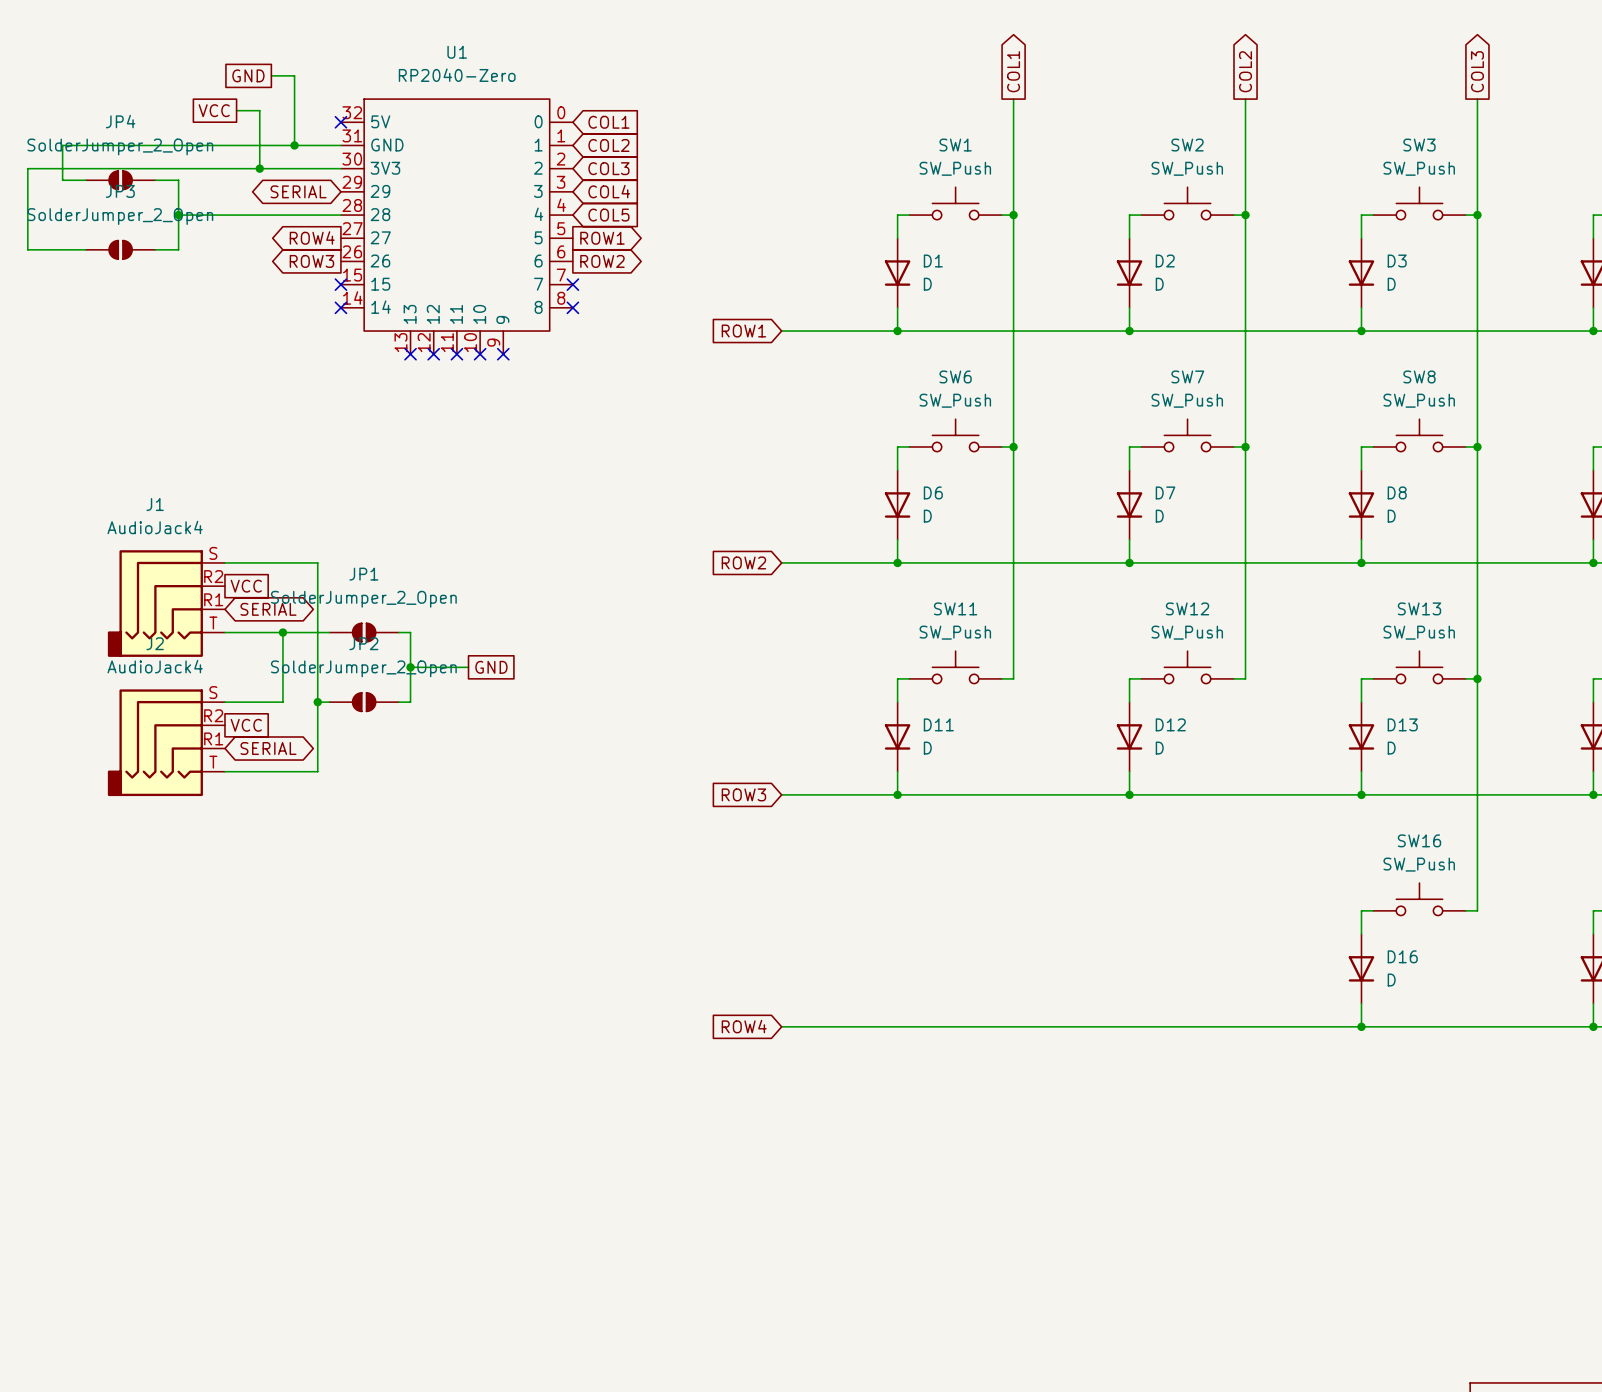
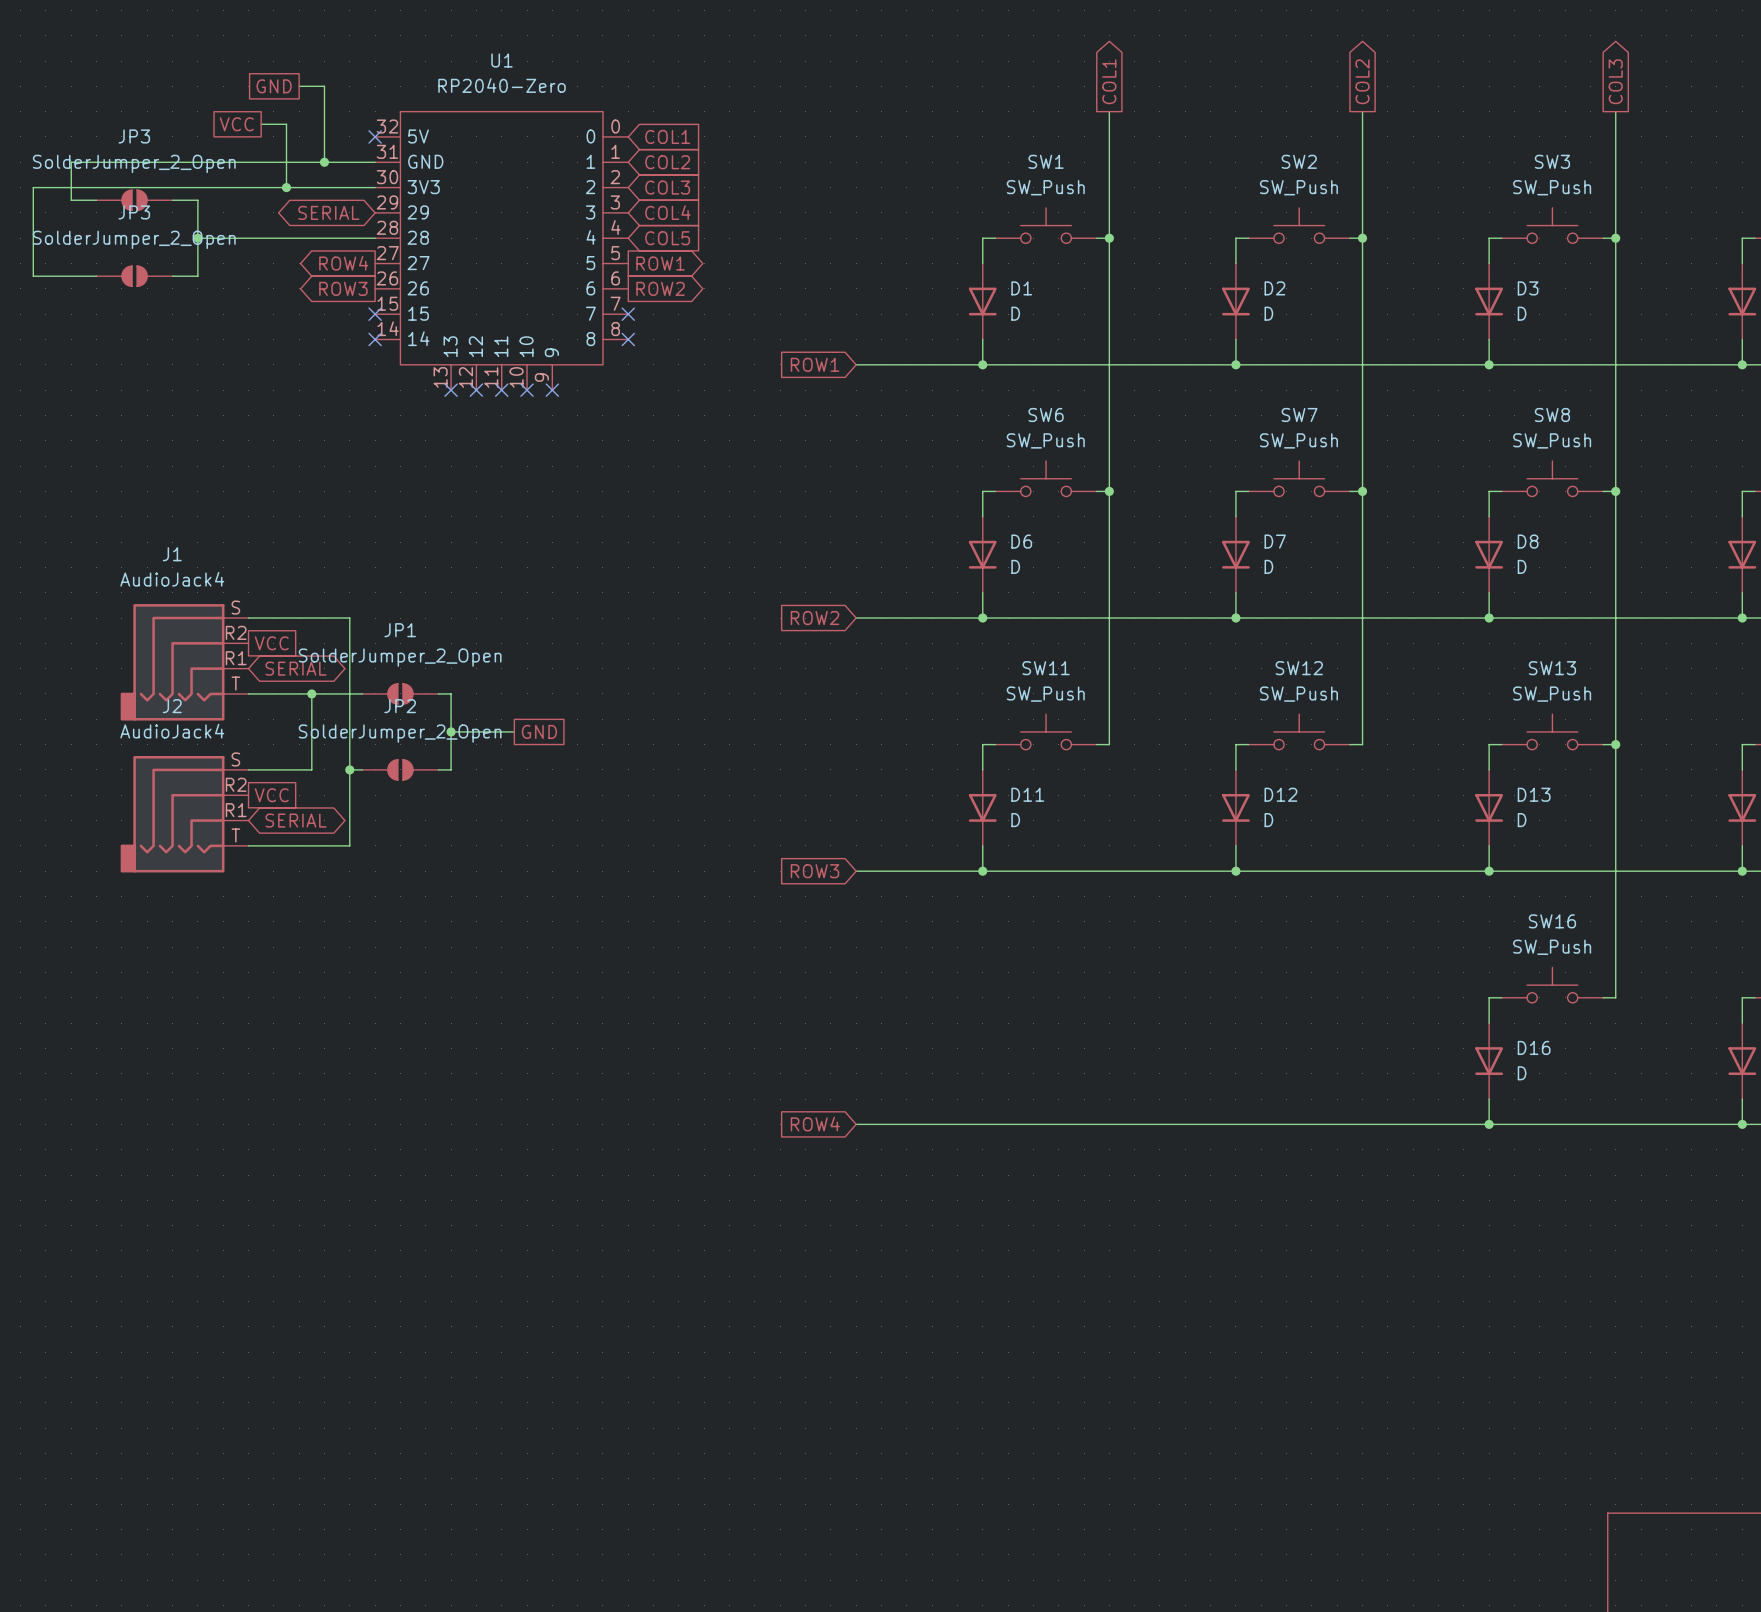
JP4 name: JP4 (120, 121) -> JP3 (134, 136)

